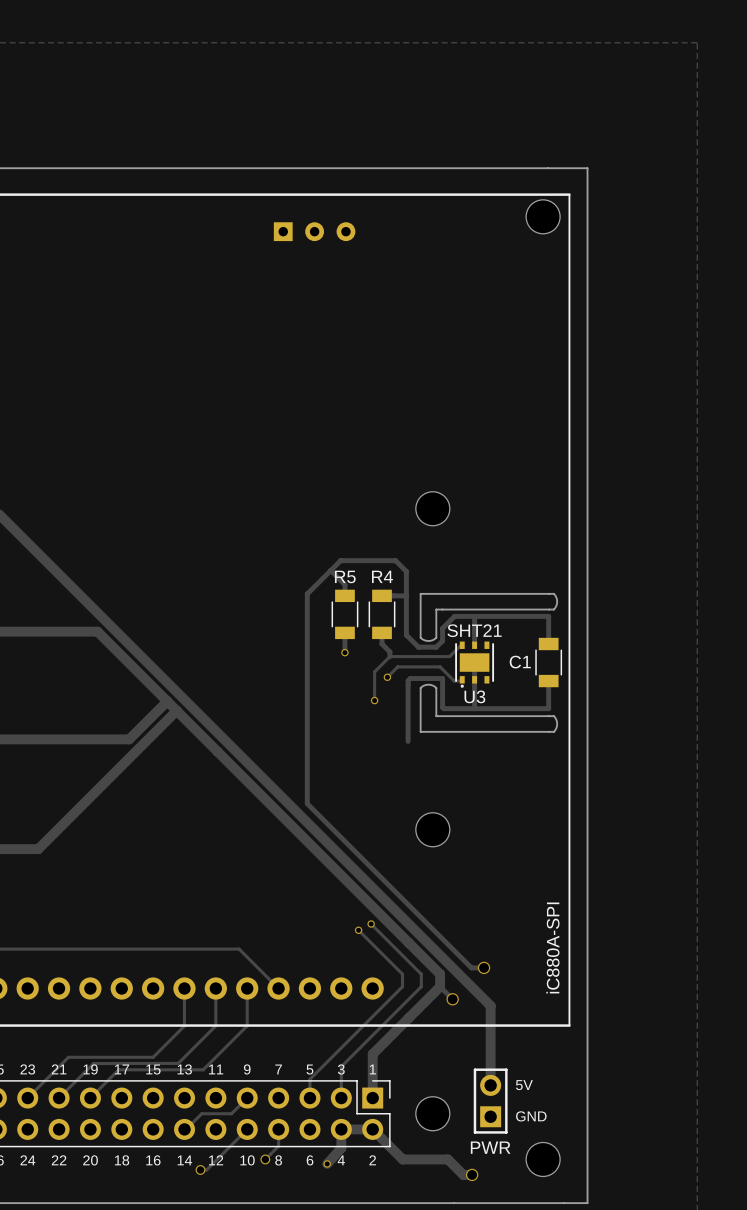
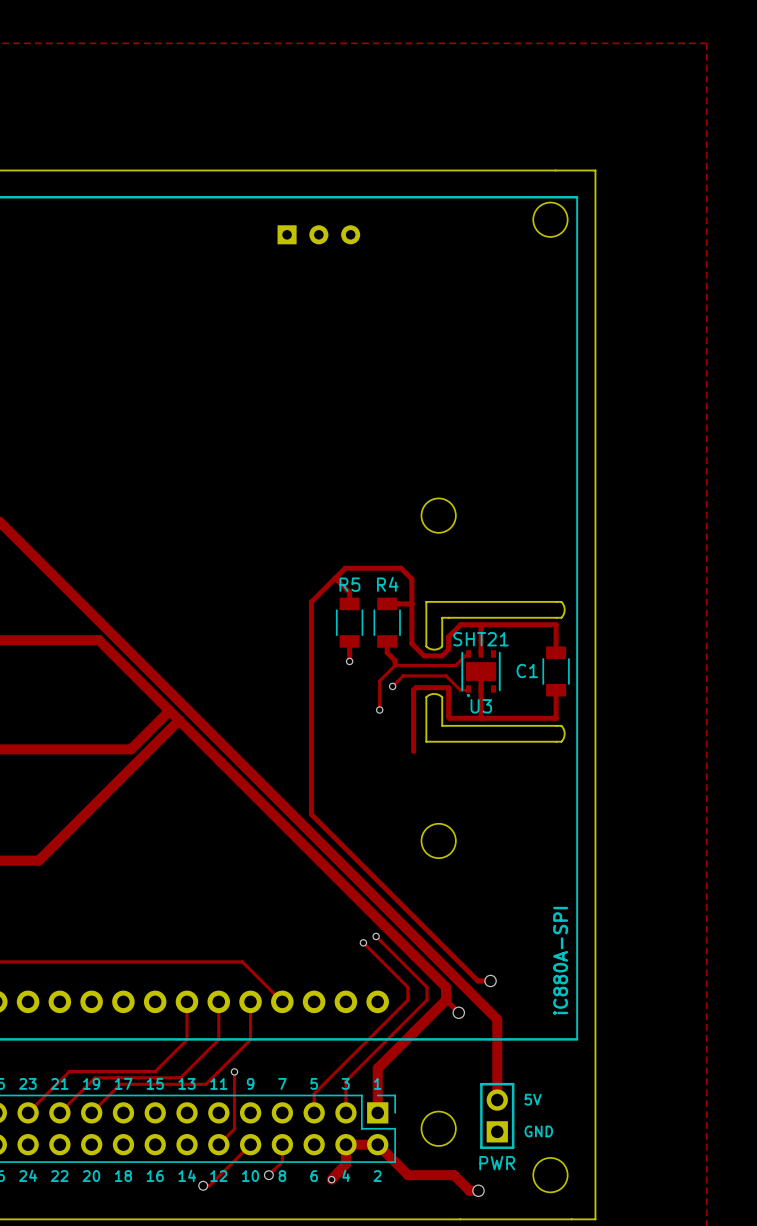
track: none -> (234, 1071) (234, 1128) (218, 1144)
via: none -> (234, 1071)
track: (247, 1098) (231, 1113) (201, 1113) (186, 1129) -> none

